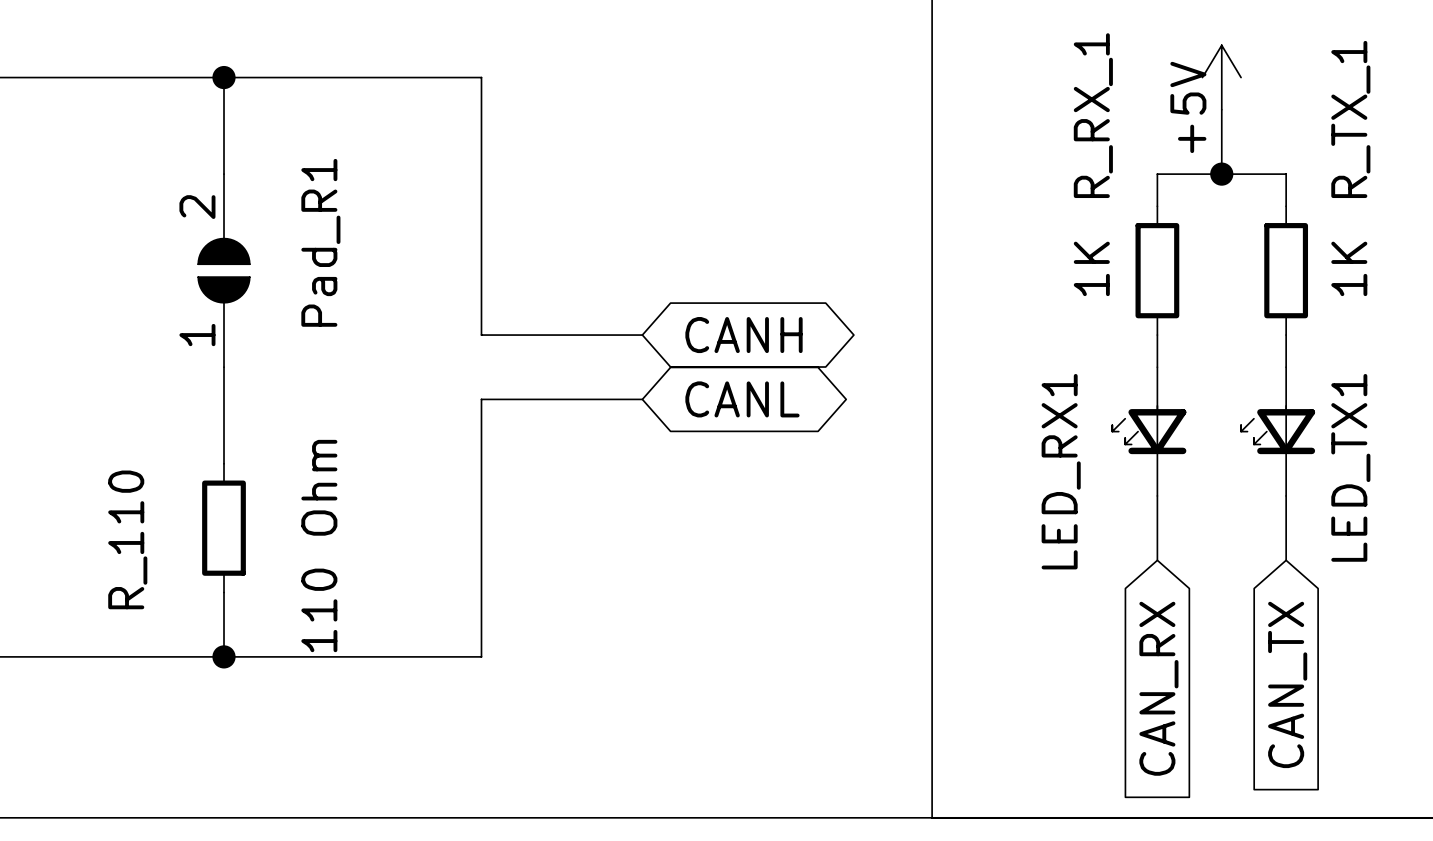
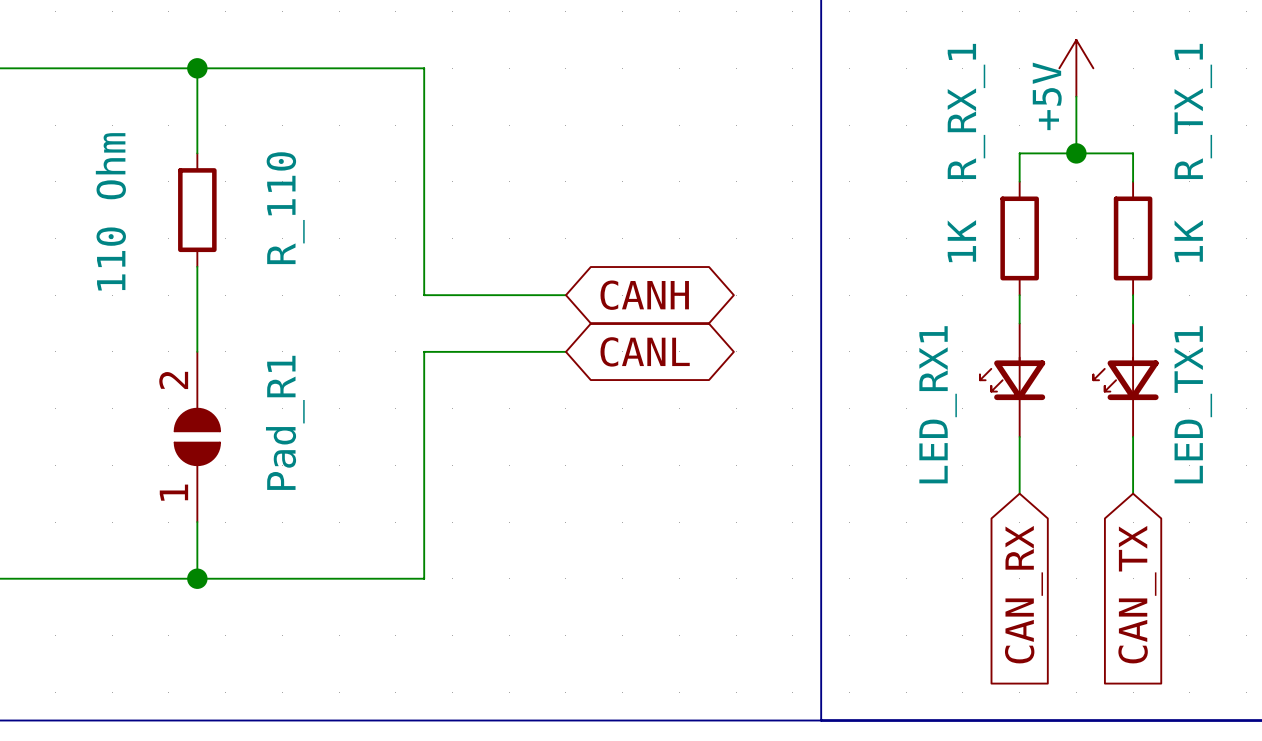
Pad_R1 position: (224, 270) -> (197, 436)
R_110 position: (224, 528) -> (197, 210)
R_110 name position: R_110 (127, 539) -> R_110 (285, 208)
R_110 value position: 110 Ohm (319, 546) -> 110 Ohm (110, 211)

